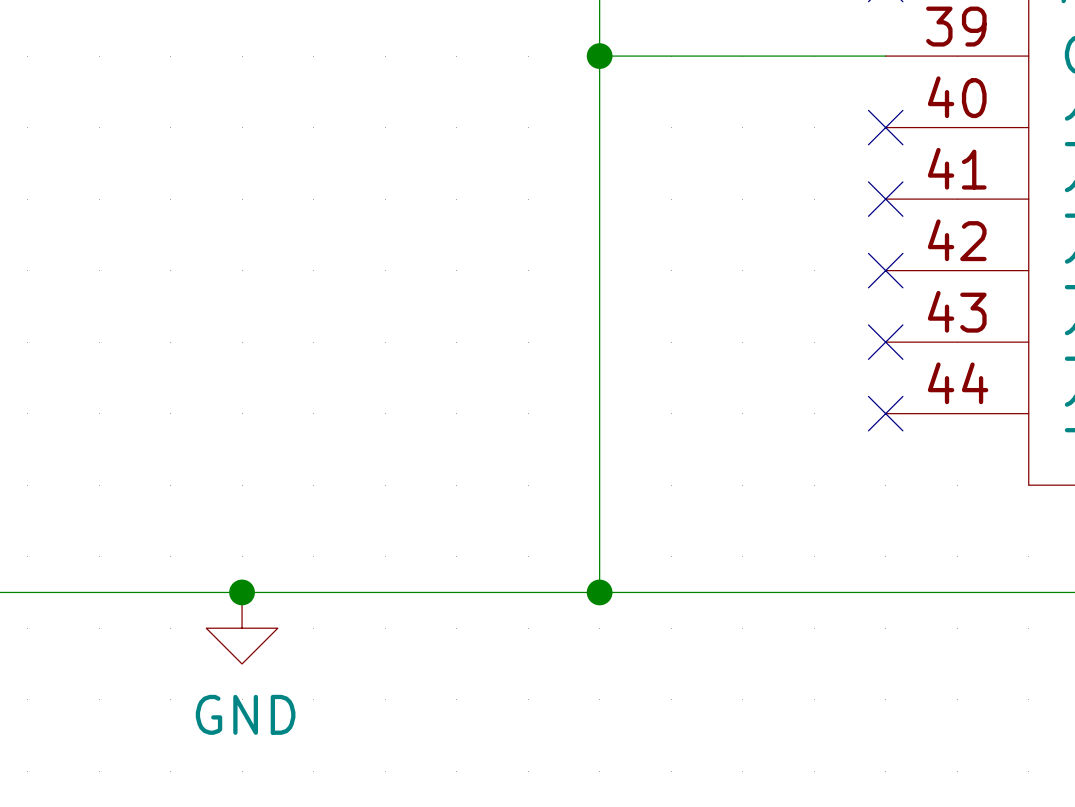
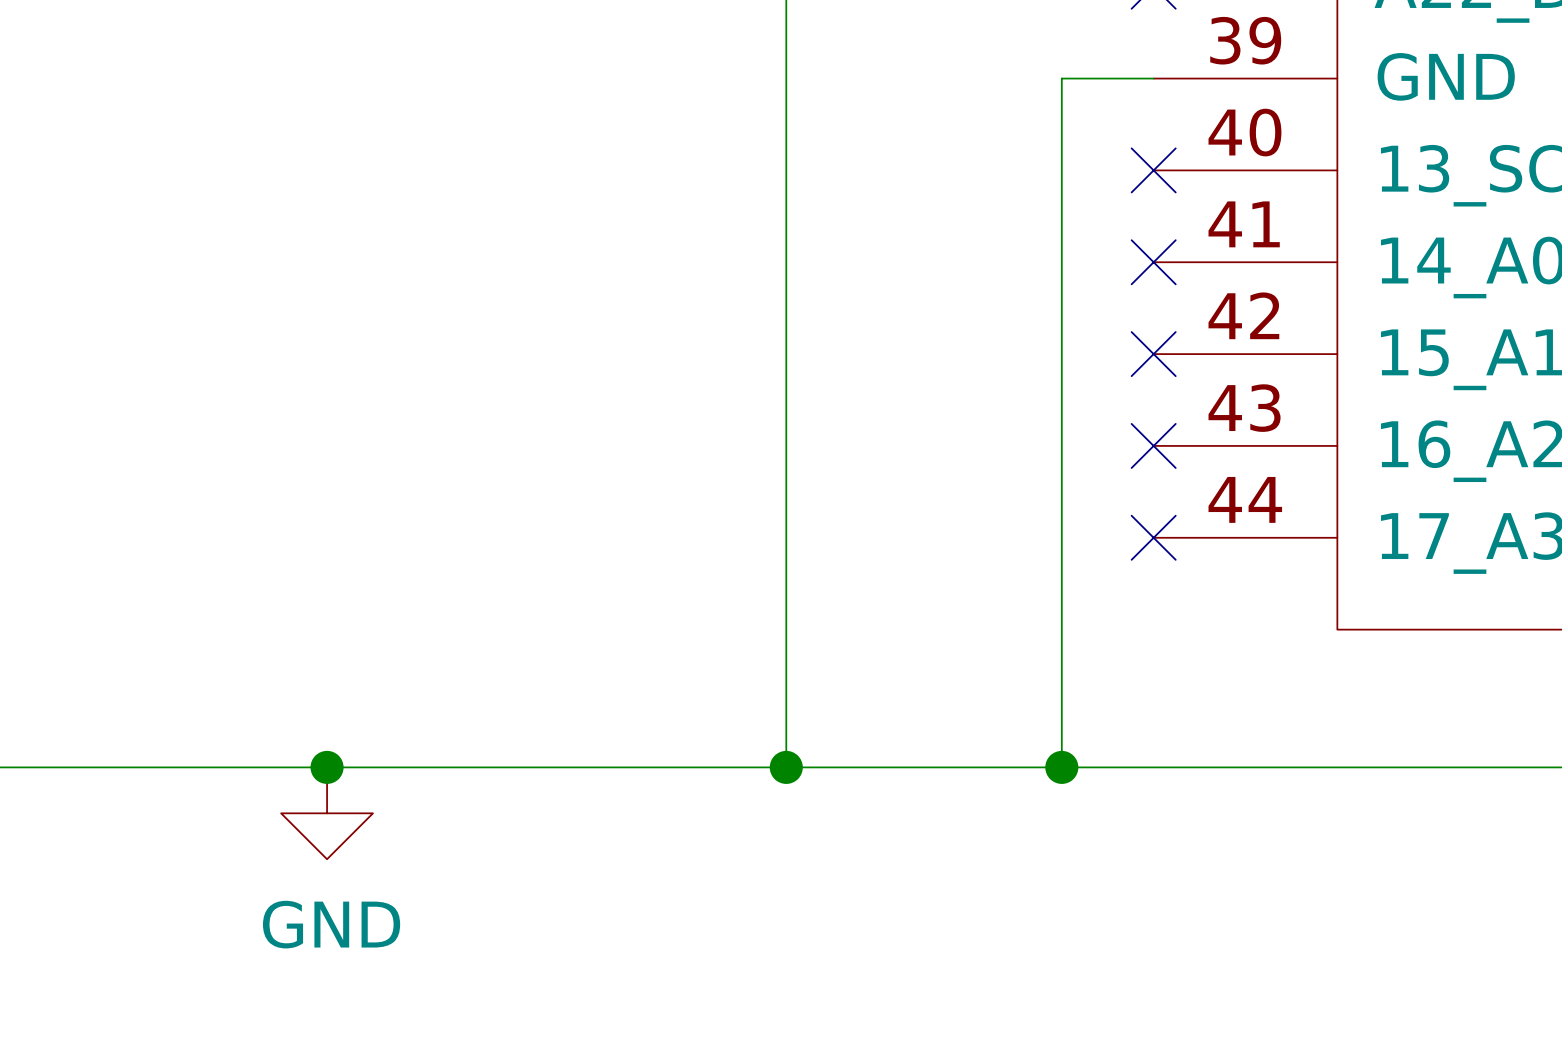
wire: (599, 56) (814, 56) -> (1061, 767) (1061, 78)
junction: (599, 56) -> none
junction: none -> (1061, 767)

